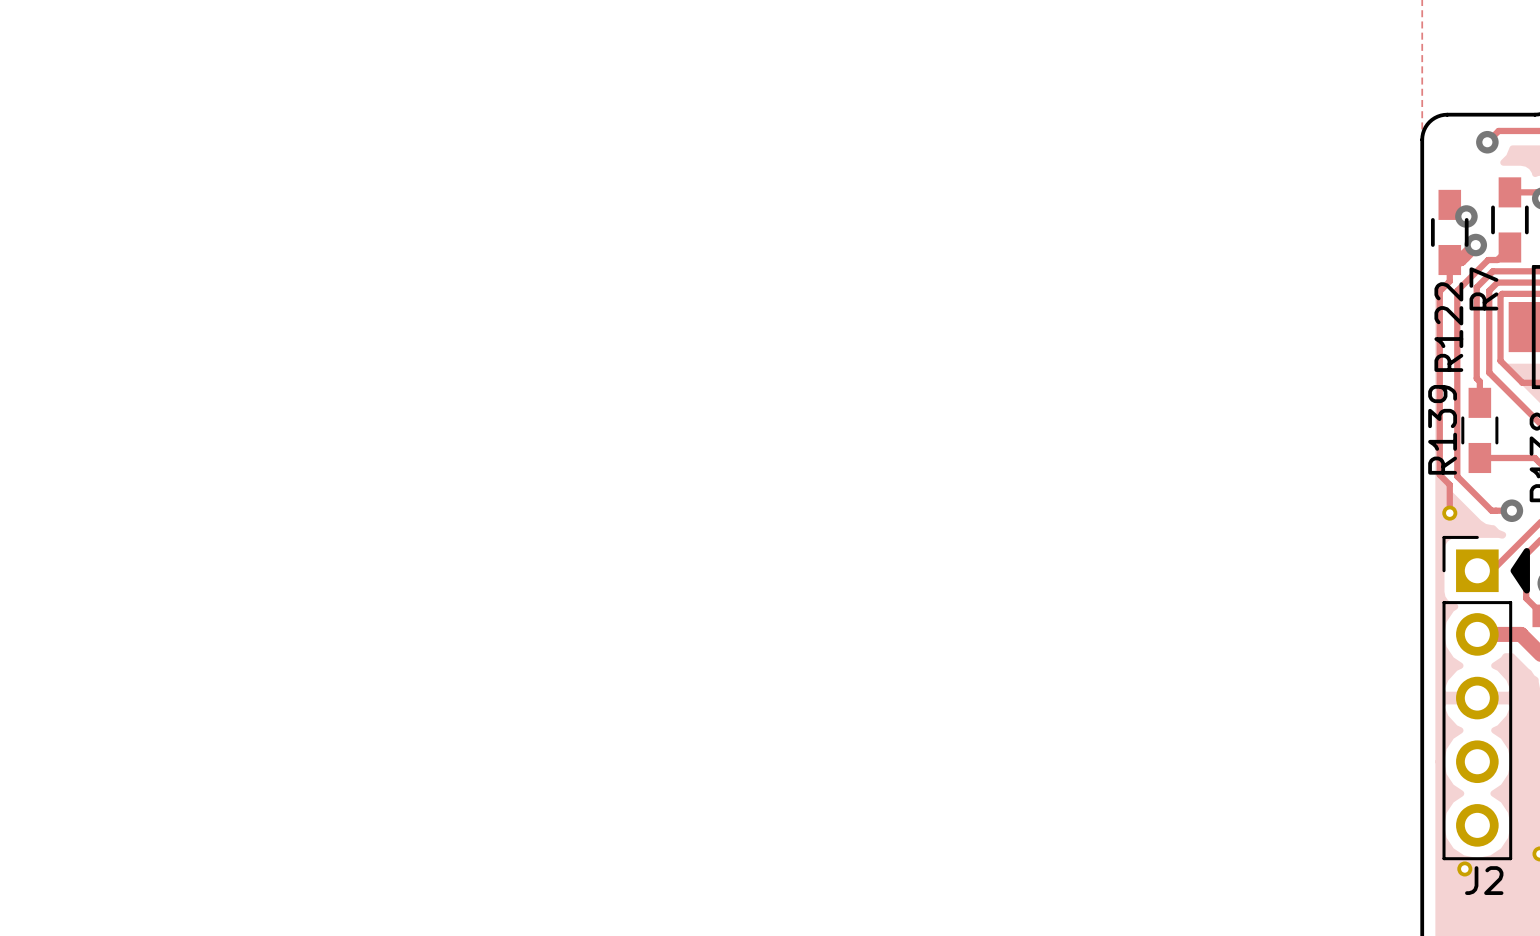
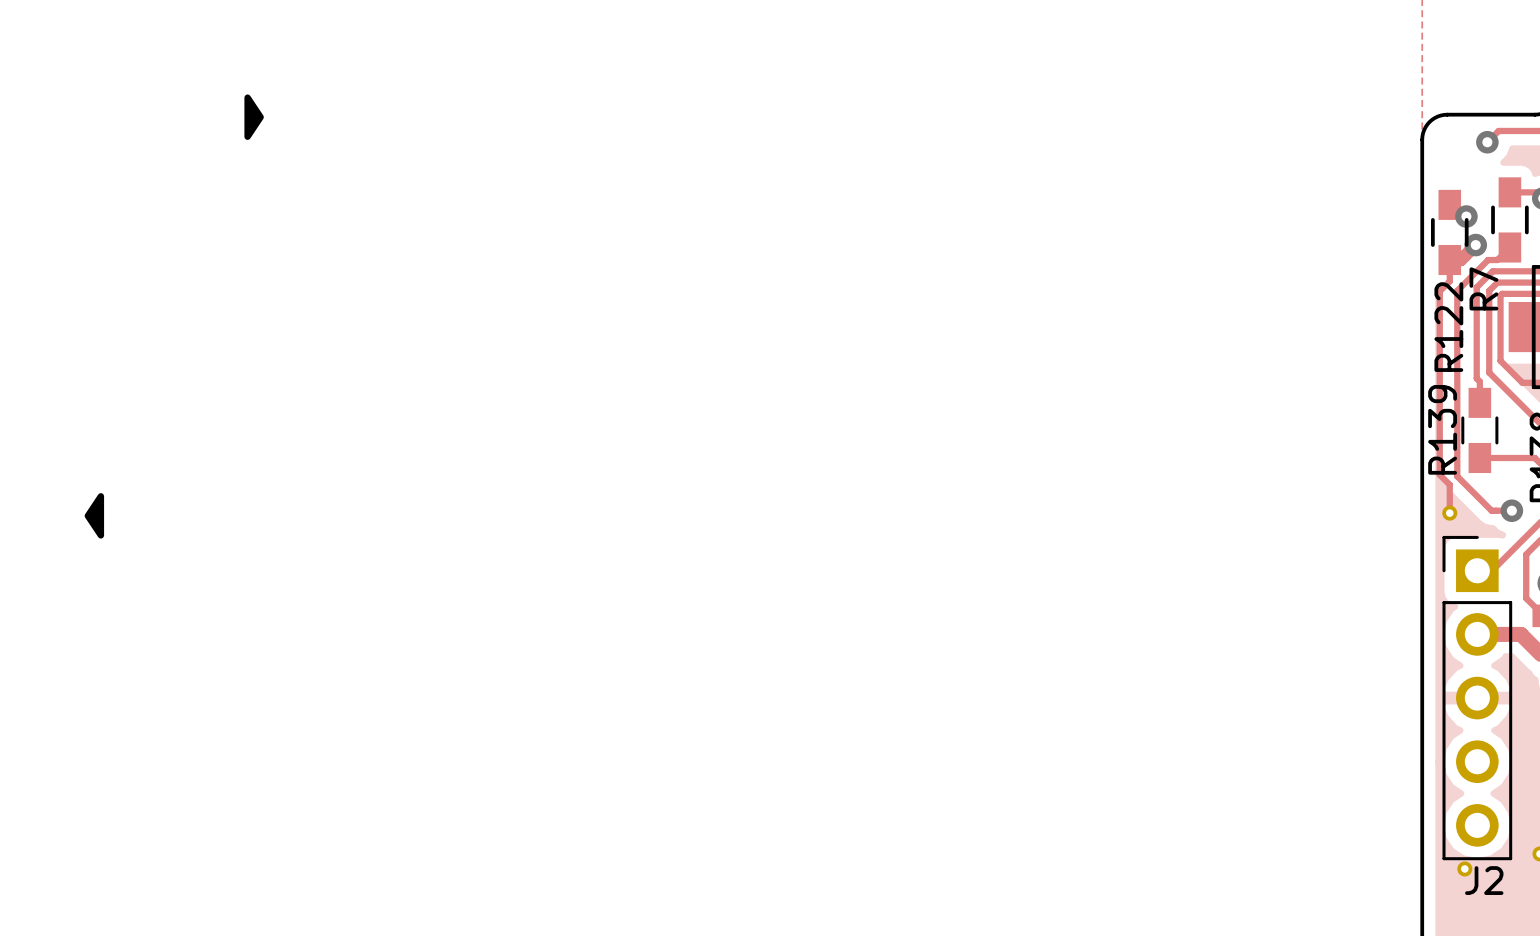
drawing: none -> [244, 94, 264, 140]
drawing: none -> [84, 493, 105, 539]
drawing: [1510, 548, 1530, 594] -> none

